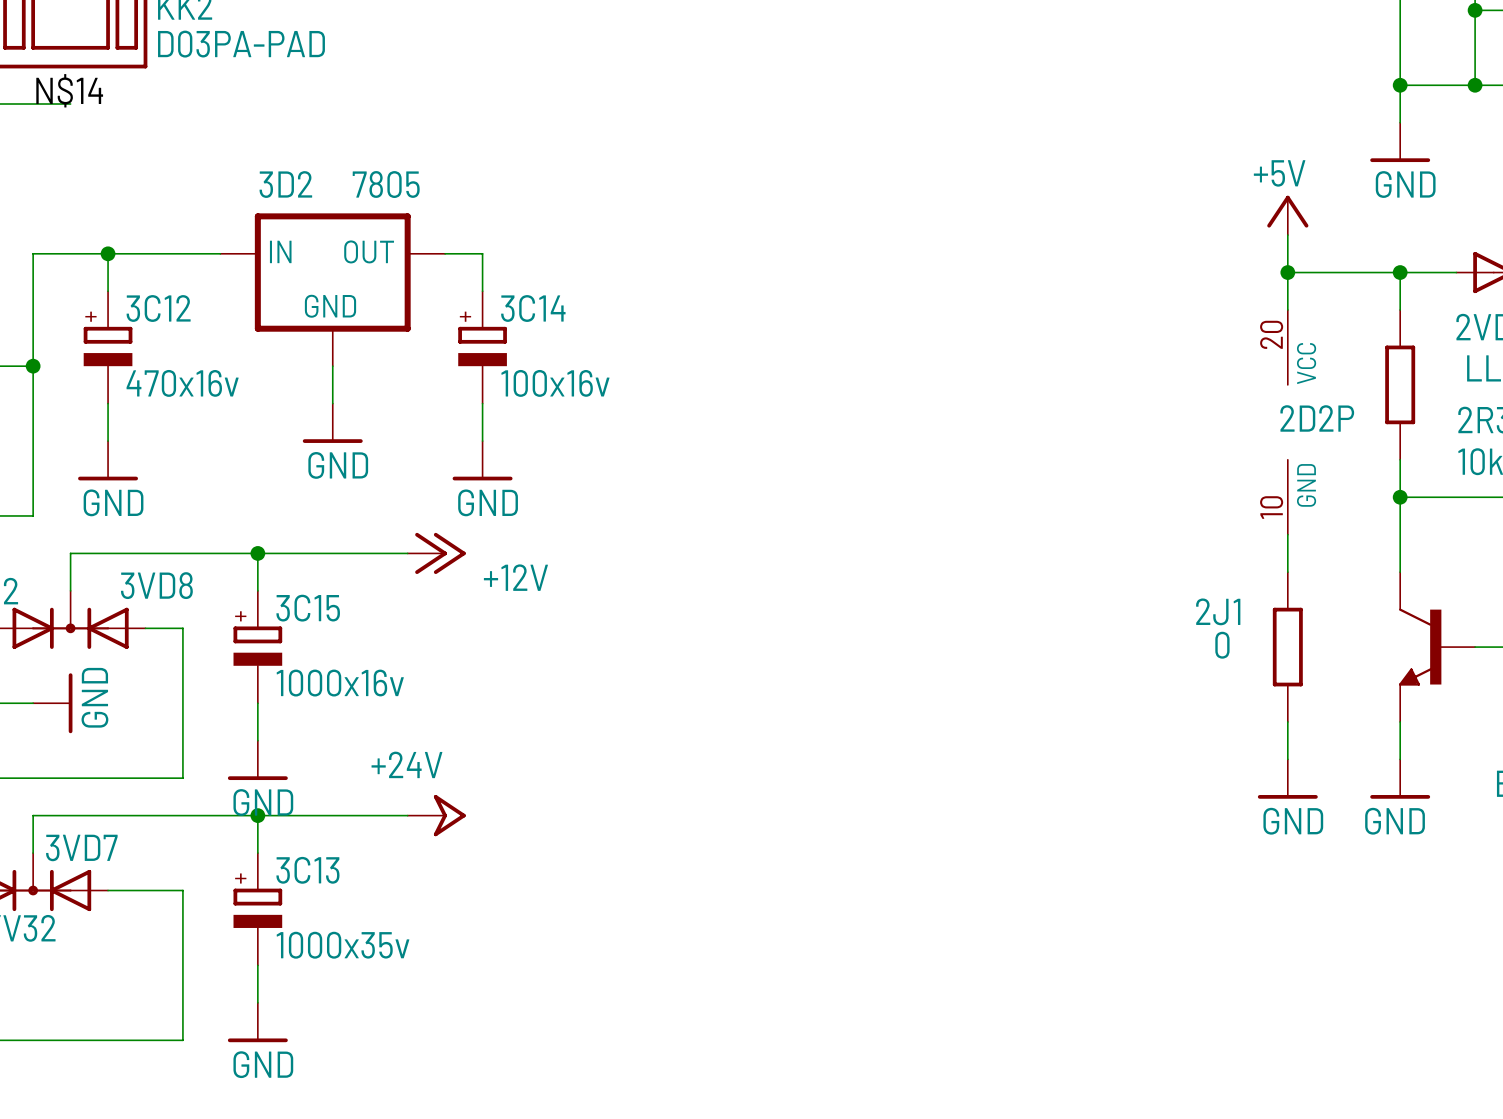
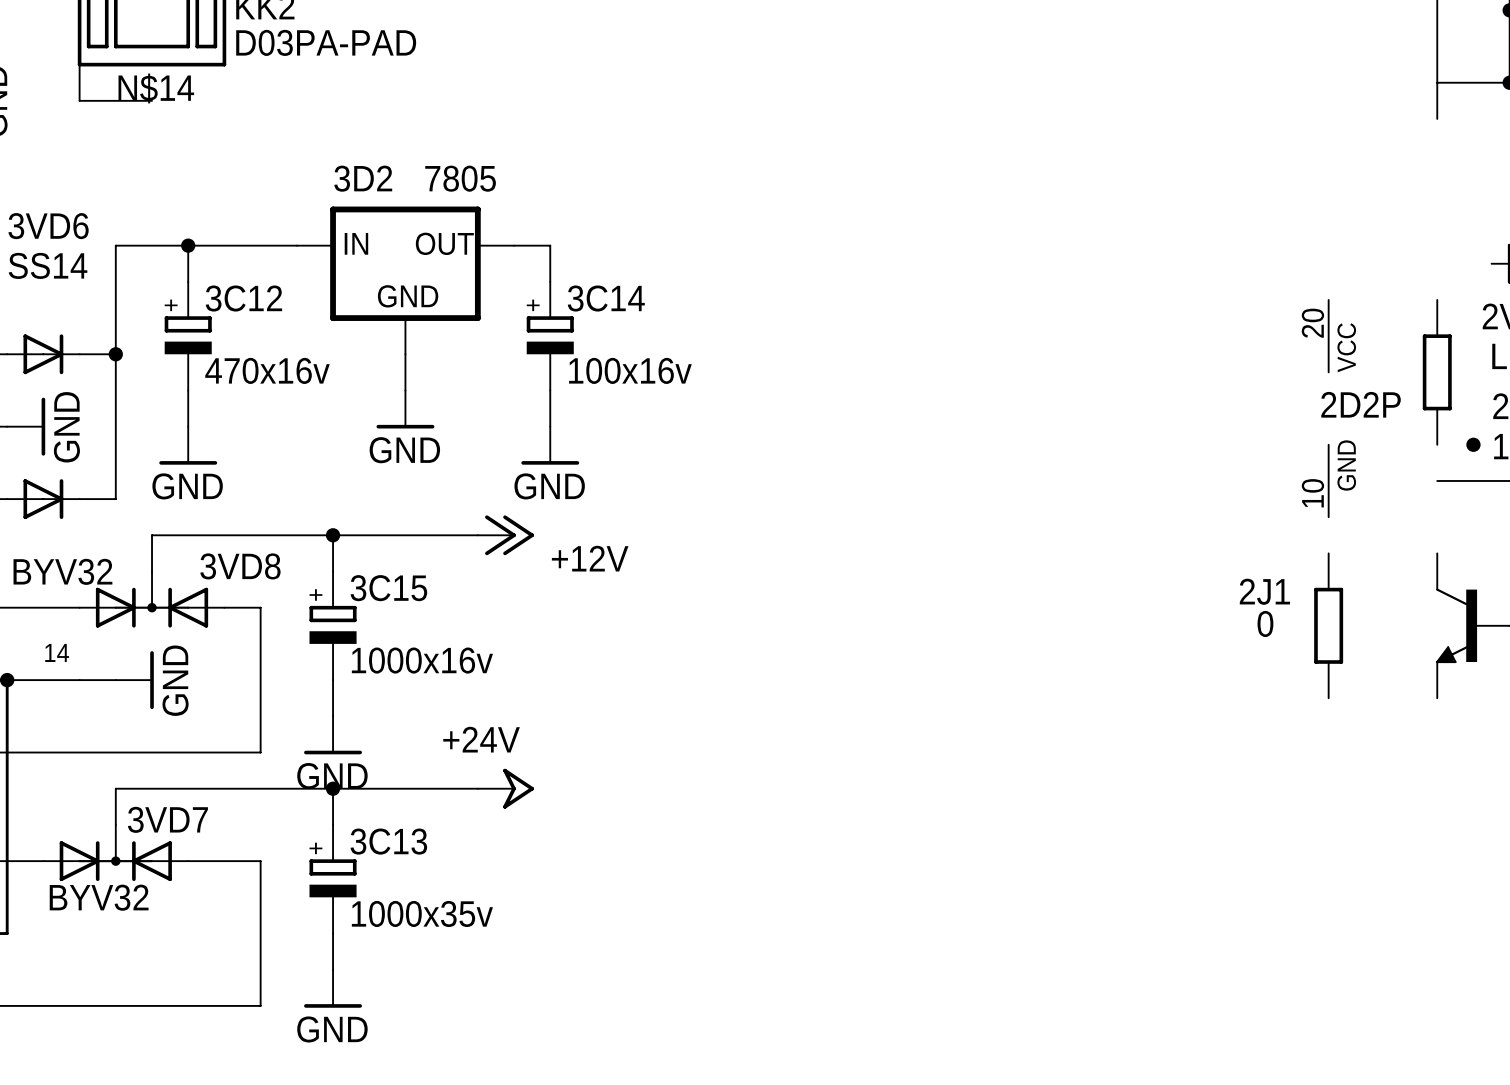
junction: (1400, 85) -> none
power symbol: GND (1400, 142) -> none
power symbol: +5V (1287, 215) -> none
wire: (1287, 235) (1287, 309) -> none
wire: (1287, 272) (1456, 272) -> none
junction: (1287, 272) -> none
wire: (1400, 272) (1400, 309) -> none
junction: (1400, 272) -> none
wire: (1400, 459) (1400, 572) -> none
junction position: (1400, 497) -> (1473, 444)
wire: (1287, 534) (1287, 572) -> none
wire: (1287, 721) (1287, 759) -> none
wire: (1400, 721) (1400, 759) -> none
power symbol: GND (1287, 779) -> none
power symbol: GND (1400, 779) -> none

